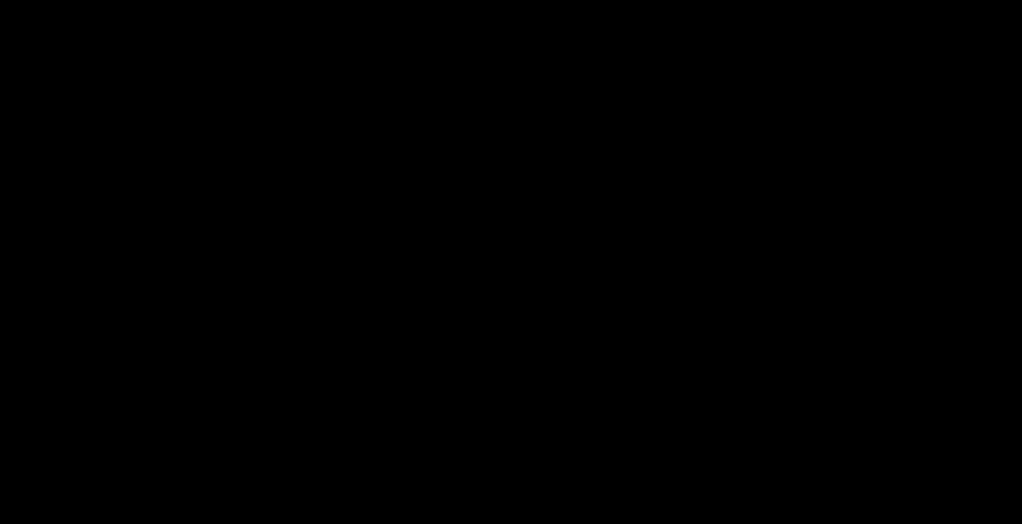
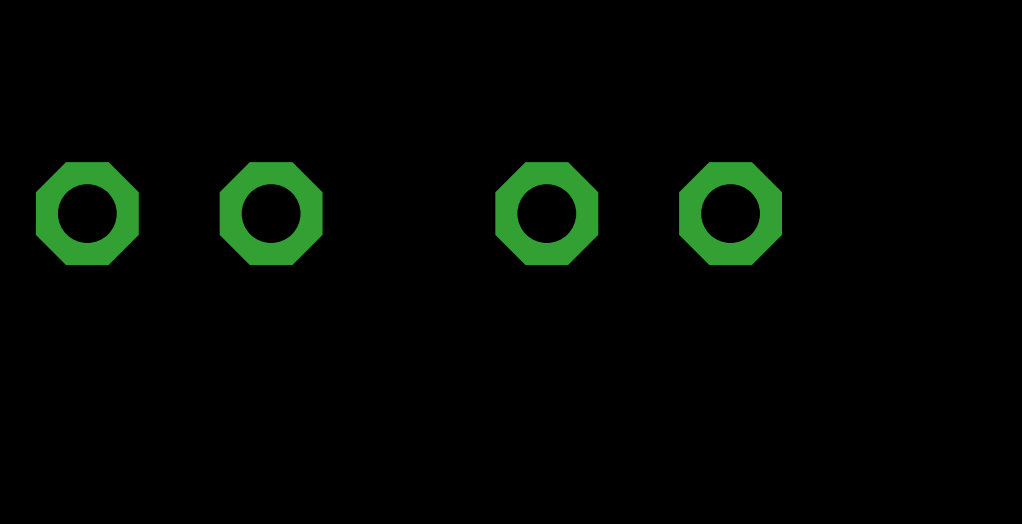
part: none -> (179, 213)
part: none -> (638, 213)

